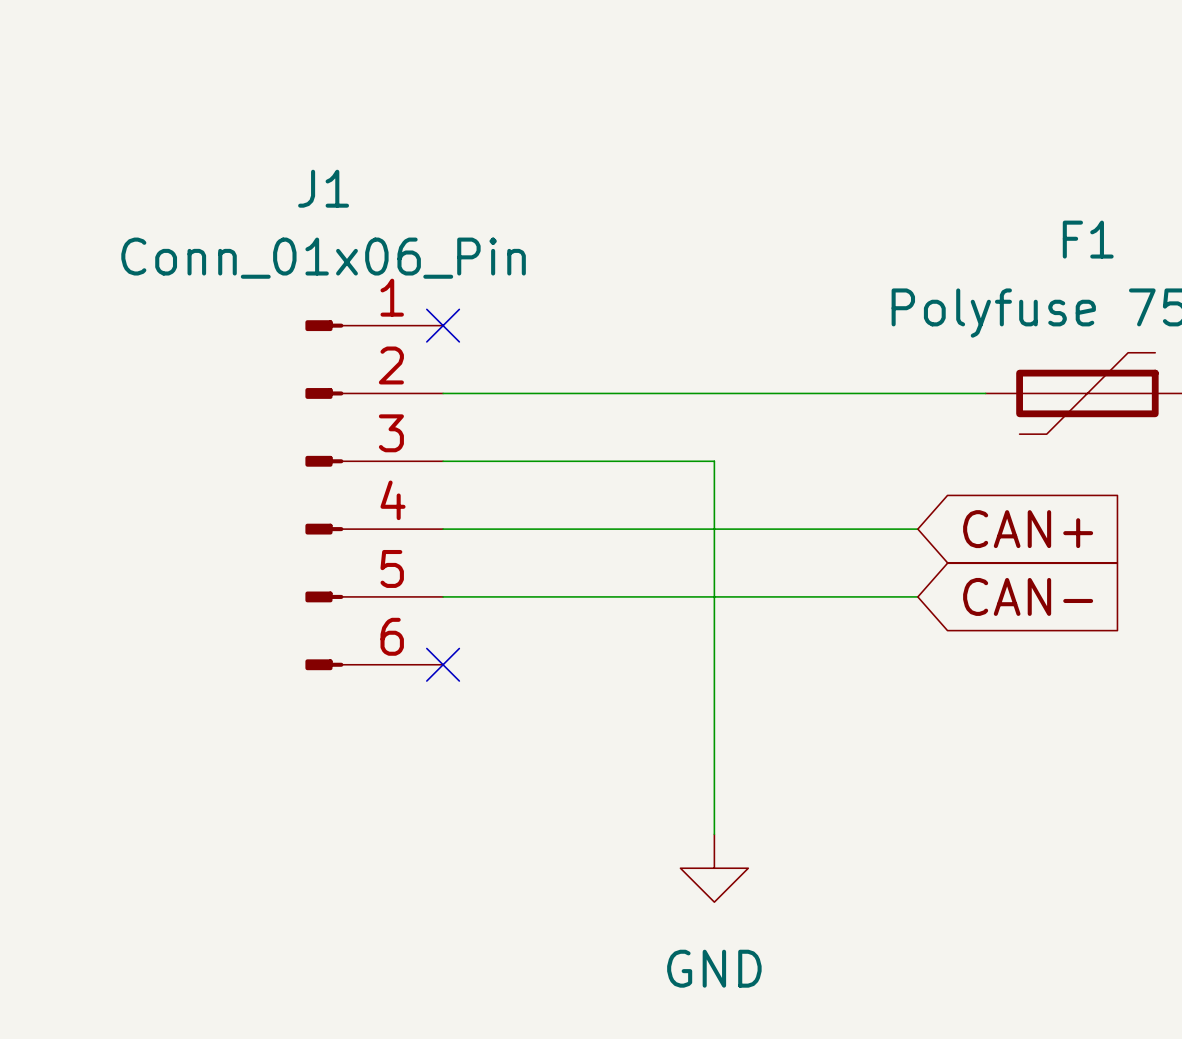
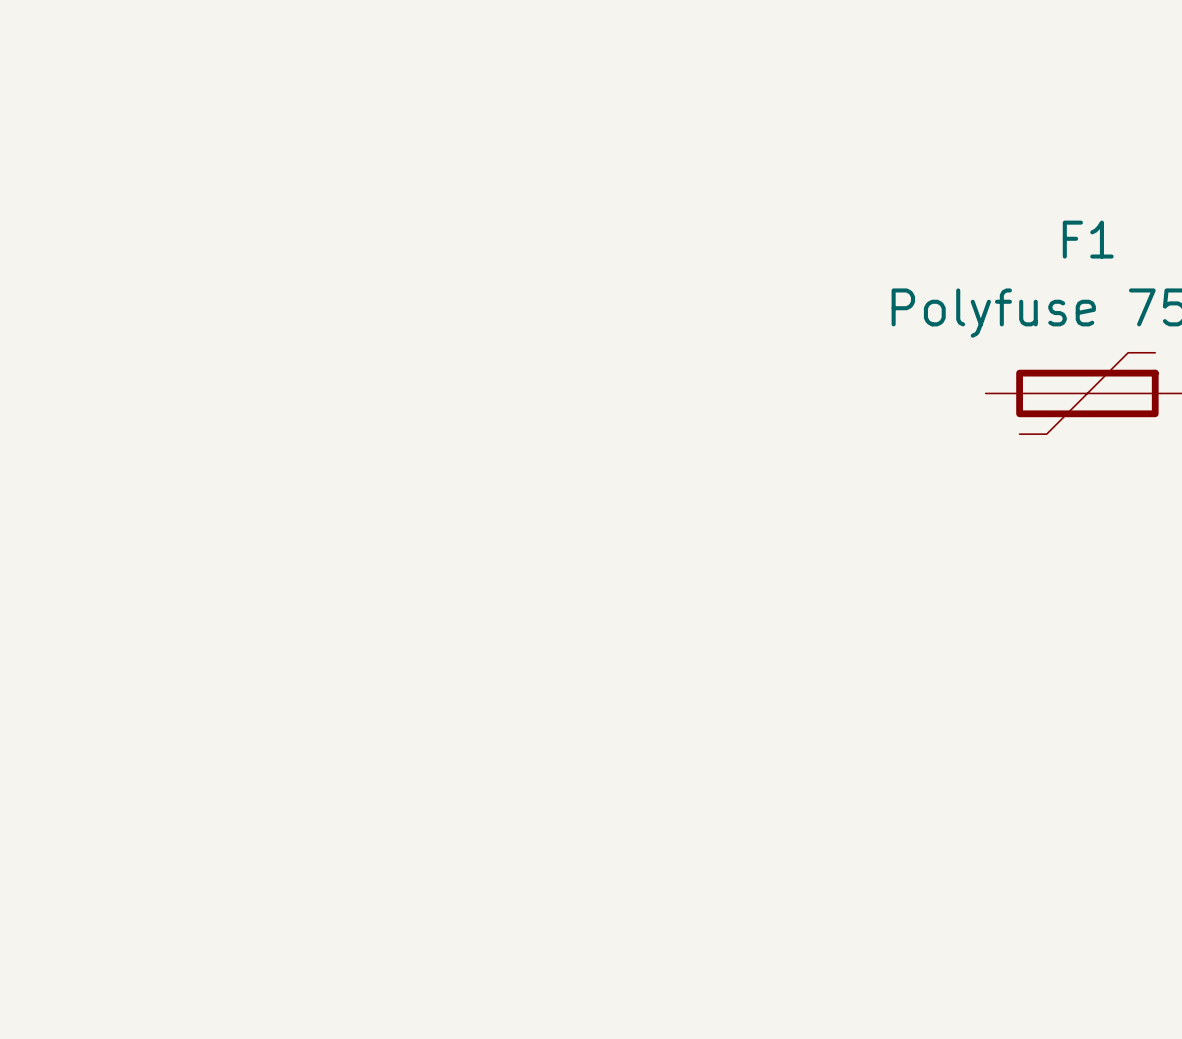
no-connect mark: (443, 325) -> none
wire: (443, 393) (985, 393) -> none
wire: (443, 461) (714, 461) (714, 834) -> none
J1: Conn_01x06_Pin (374, 495) -> none
wire: (443, 529) (917, 529) -> none
global label: CAN+ (1028, 529) -> none
wire: (443, 596) (917, 596) -> none
global label: CAN- (1028, 596) -> none
no-connect mark: (443, 664) -> none
power symbol: GND (714, 868) -> none

